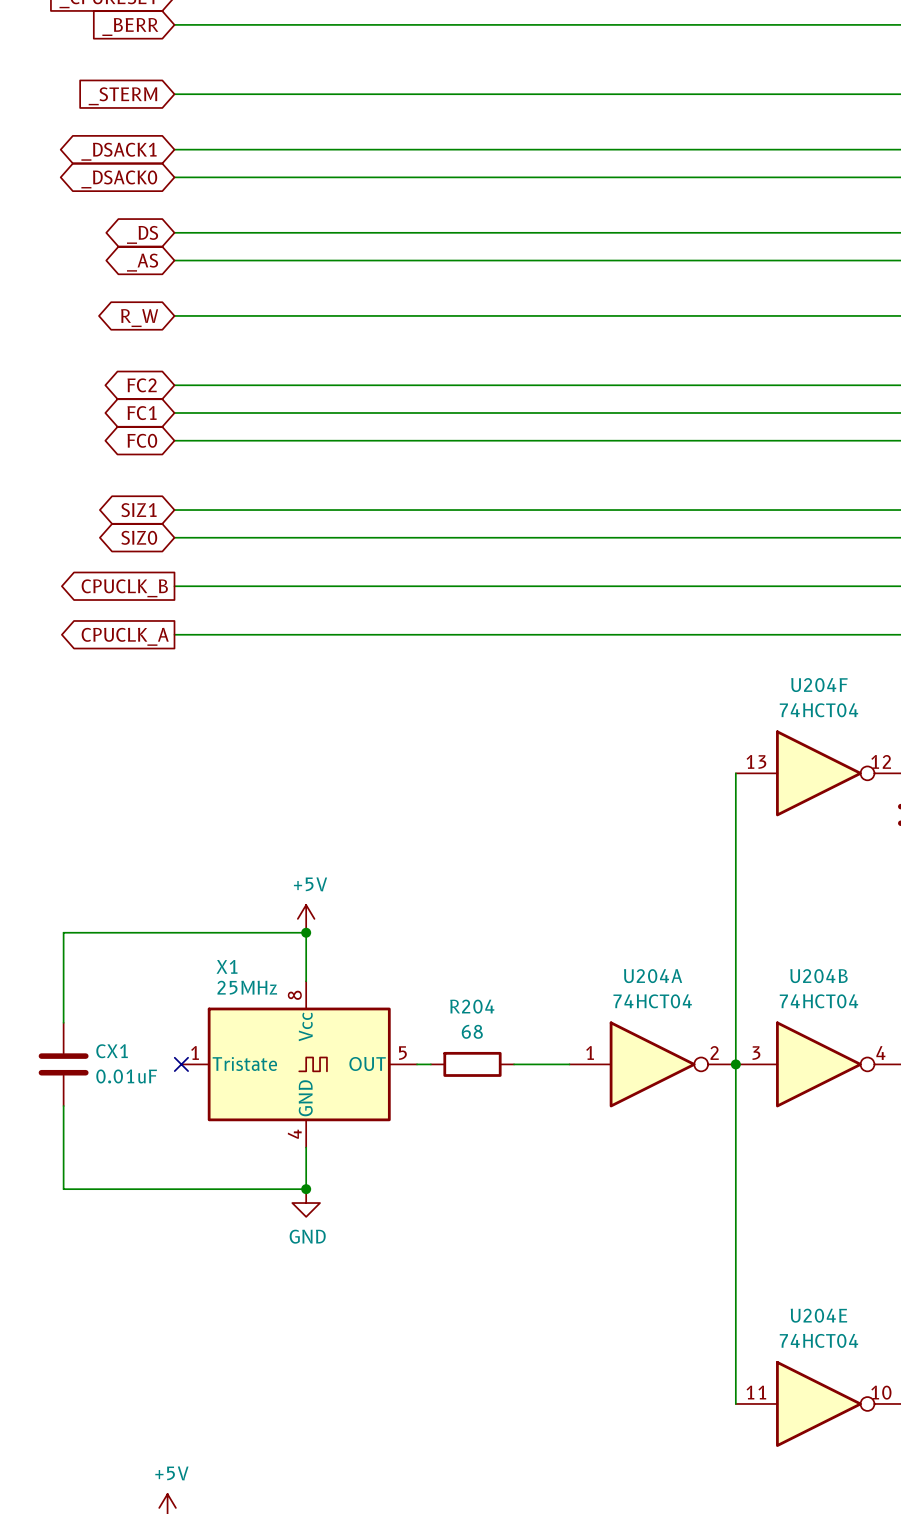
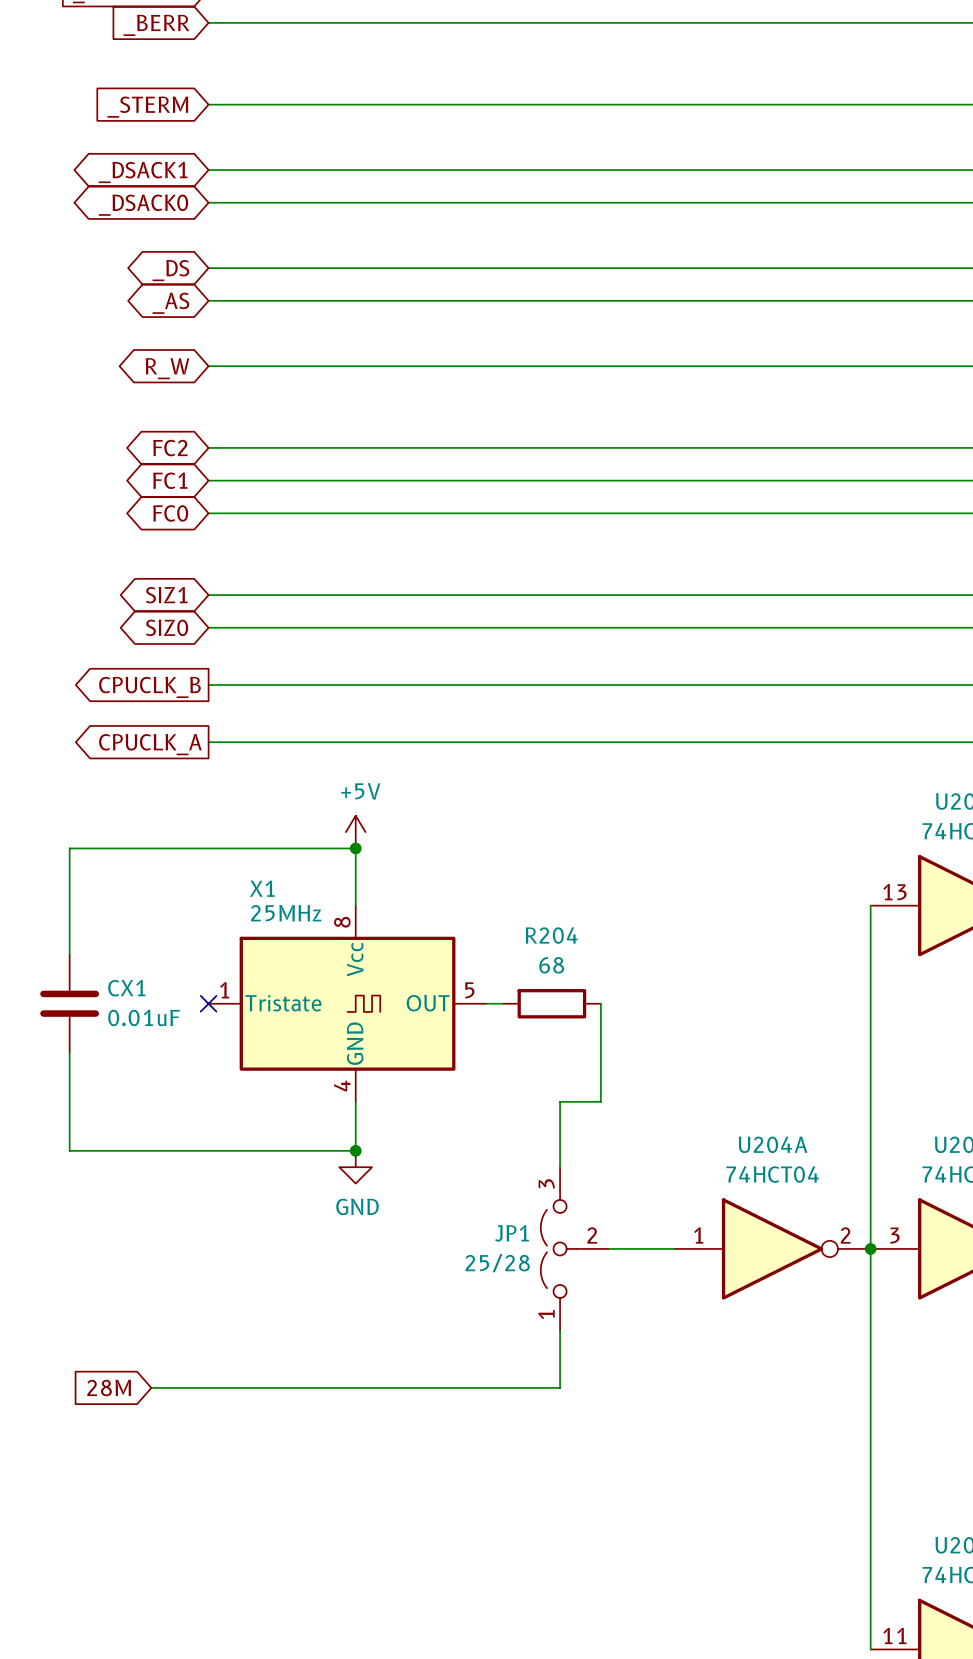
junction: none -> (355, 848)
no-connect mark: none -> (208, 1003)
wire: none -> (600, 1003) (600, 1101) (560, 1101) (560, 1167)
power symbol position: +5V (306, 918) -> +5V (355, 832)
junction position: (306, 932) -> (355, 1150)
wire: (306, 981) (306, 932) (63, 932) (63, 1022) -> (355, 905) (355, 848) (69, 848) (69, 954)
CX1 position: (63, 1064) -> (69, 1003)
no-connect mark: (181, 1064) -> none
X1 position: (299, 1064) -> (347, 1003)
wire: (417, 1064) (430, 1064) -> (486, 1003) (502, 1003)
R204 position: (472, 1064) -> (551, 1003)
JP1: none -> 25/28 (574, 1248)
wire: (63, 1105) (63, 1189) (306, 1189) (306, 1147) -> (69, 1052) (69, 1150) (355, 1150) (355, 1101)
wire: none -> (560, 1330) (560, 1387) (151, 1387)
global label: none -> 28M (109, 1388)
junction: (306, 1189) -> none
power symbol position: GND (306, 1203) -> GND (355, 1167)

